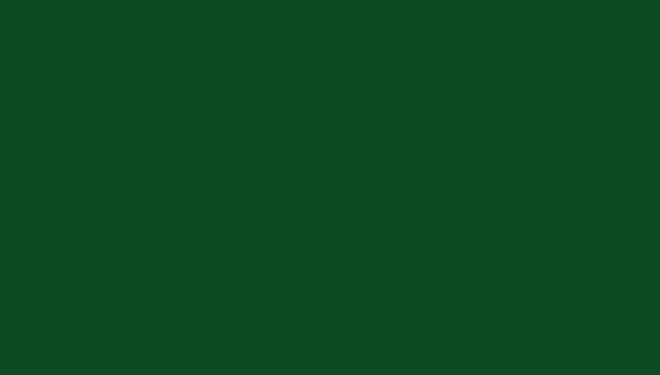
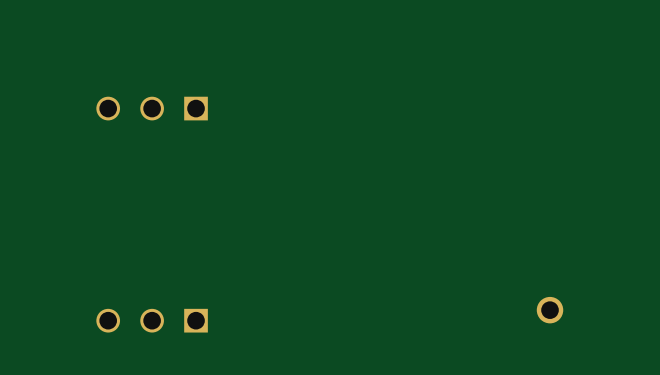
part: none -> (152, 108)
part: none -> (550, 310)
part: none -> (152, 320)

